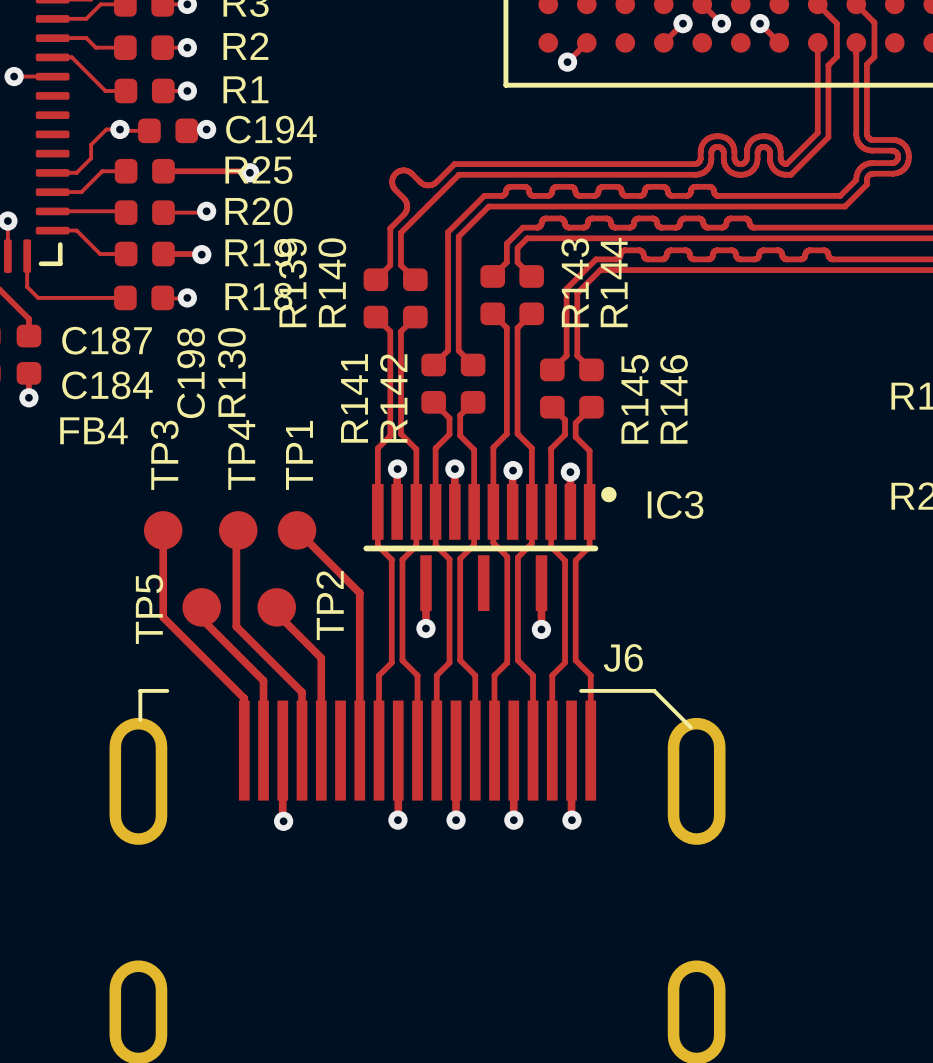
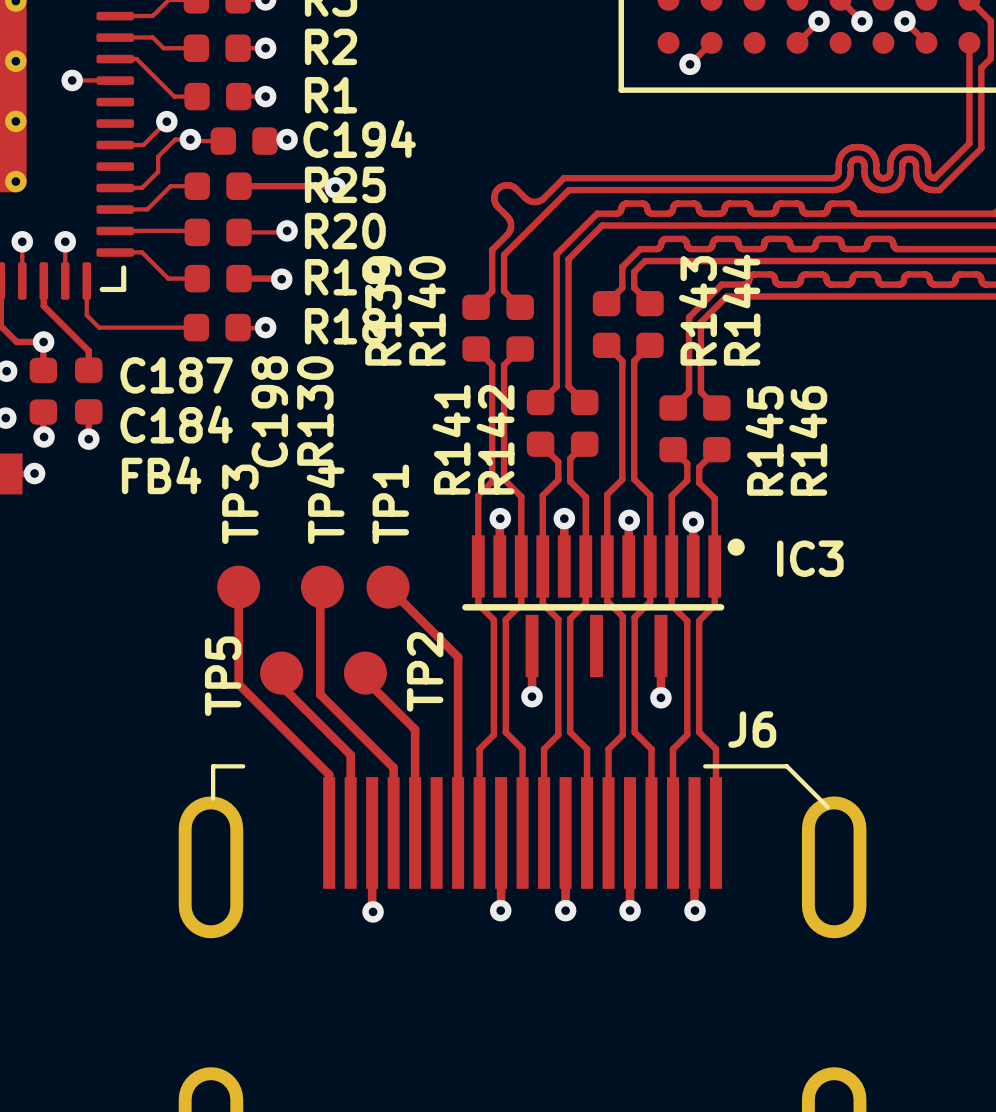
track: none -> (166, 121) (143, 145) (115, 145)
via: none -> (166, 121)

